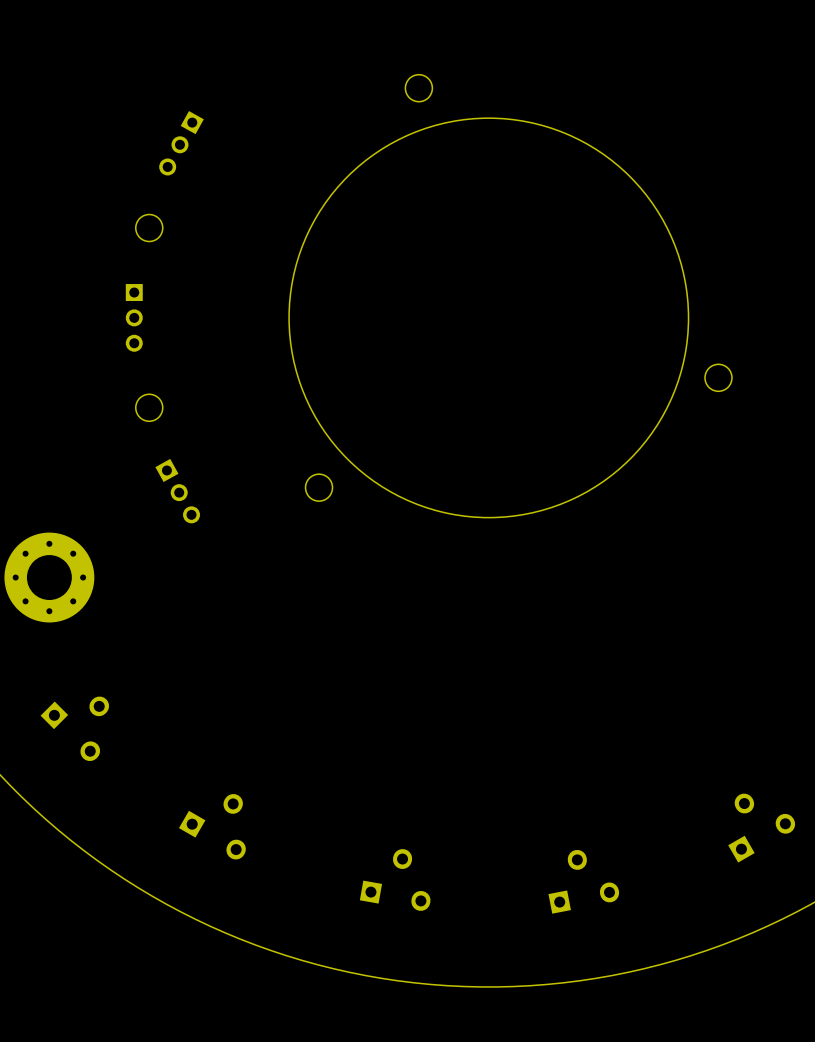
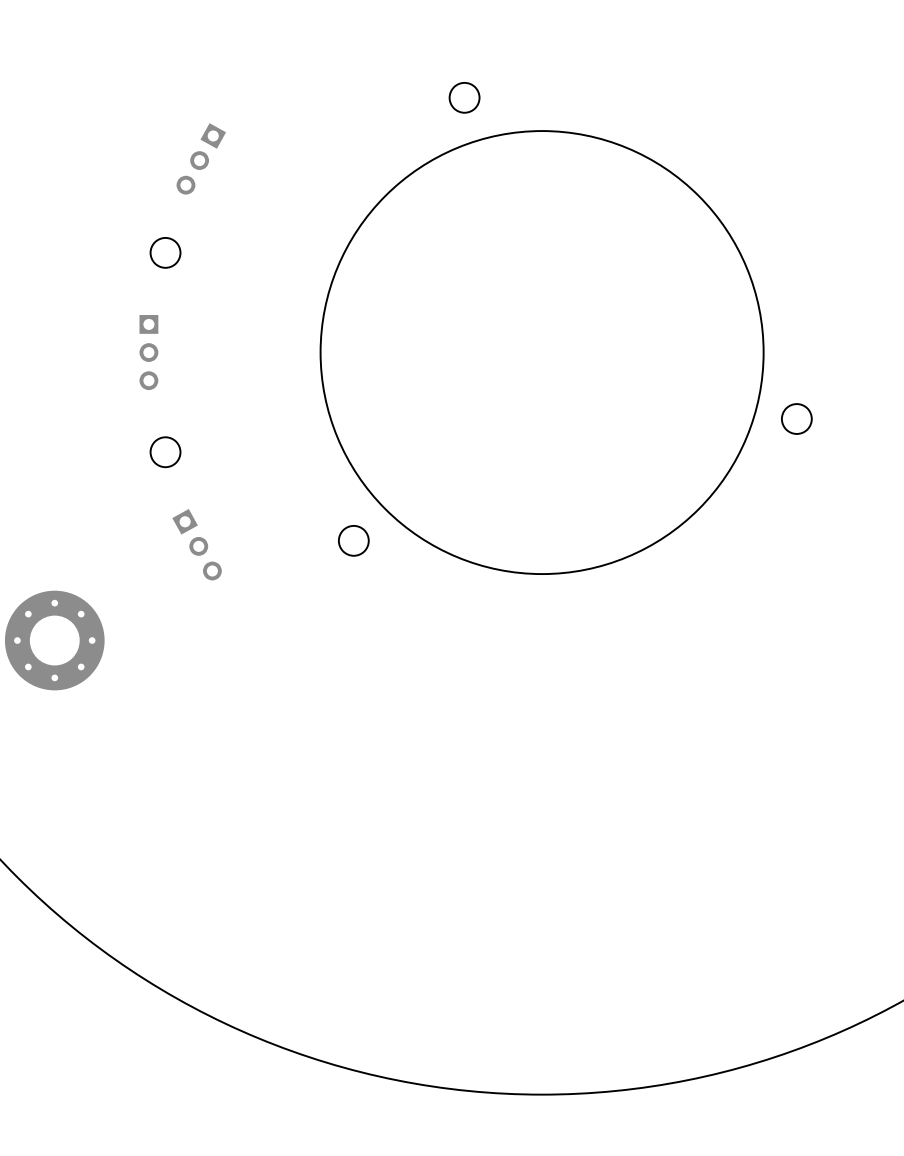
part: (74, 728) -> none
part: (212, 826) -> none
part: (761, 828) -> none
part: (395, 879) -> none
part: (583, 881) -> none

